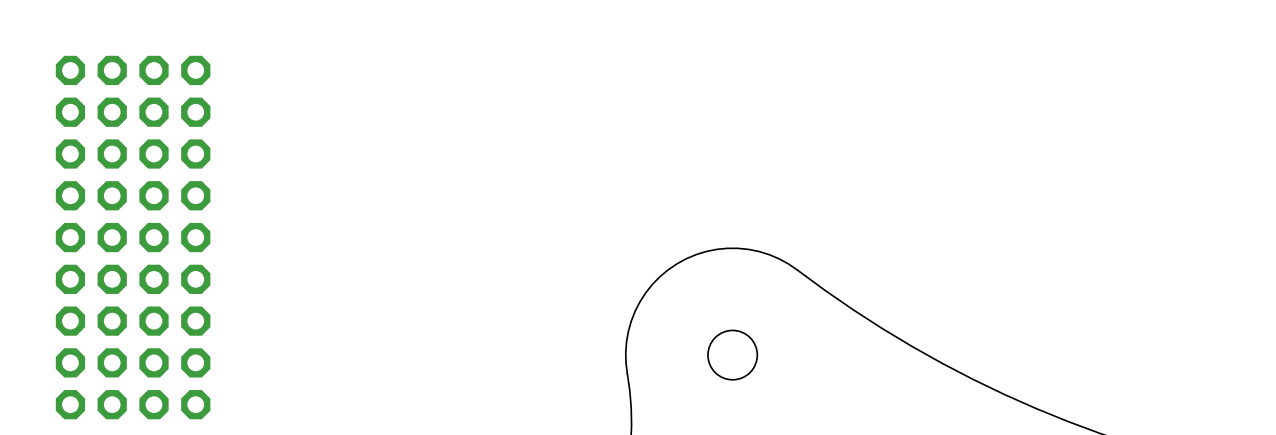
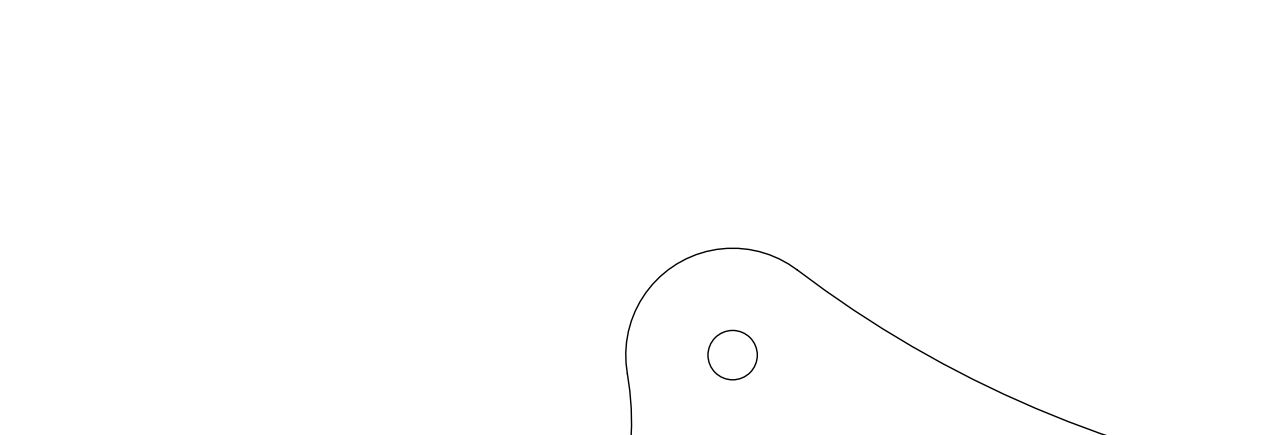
part: (70, 237) -> none
part: (112, 237) -> none
part: (154, 237) -> none
part: (195, 237) -> none

